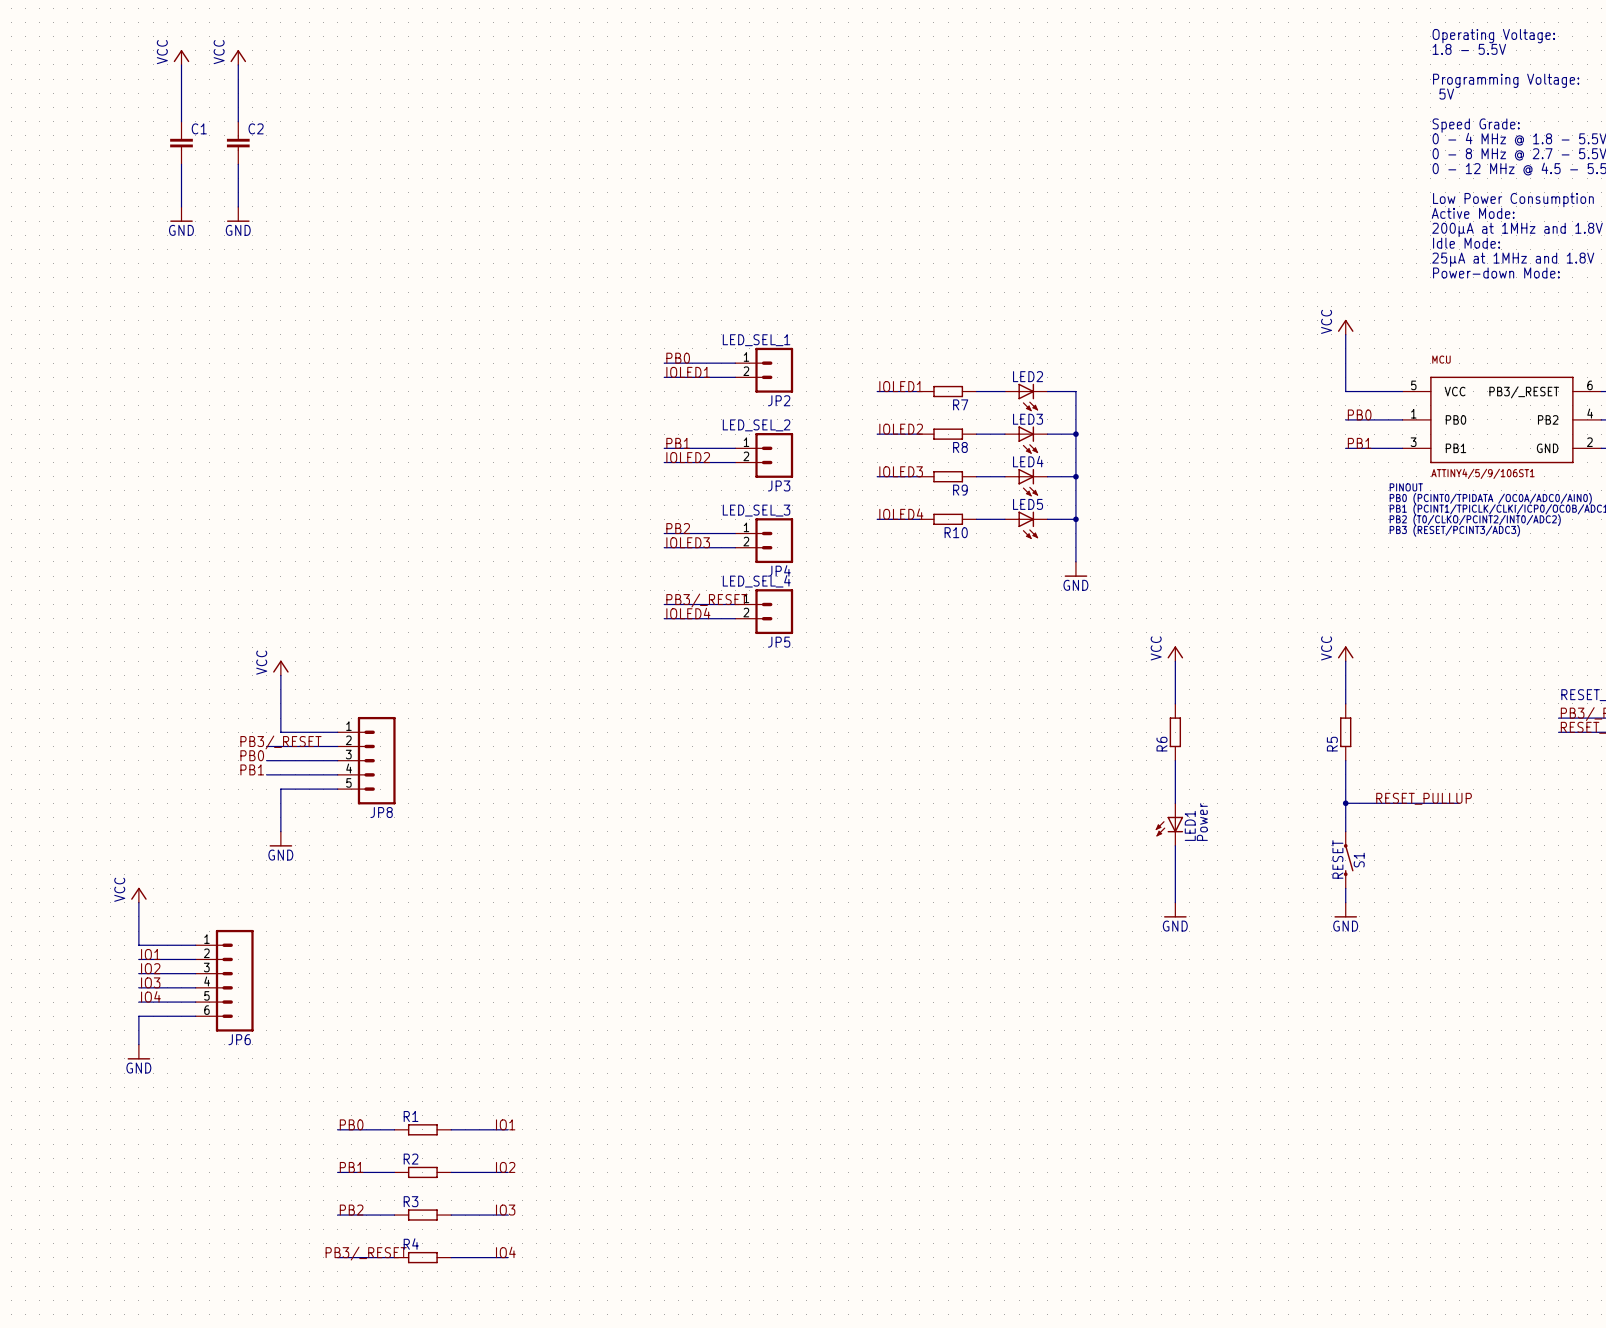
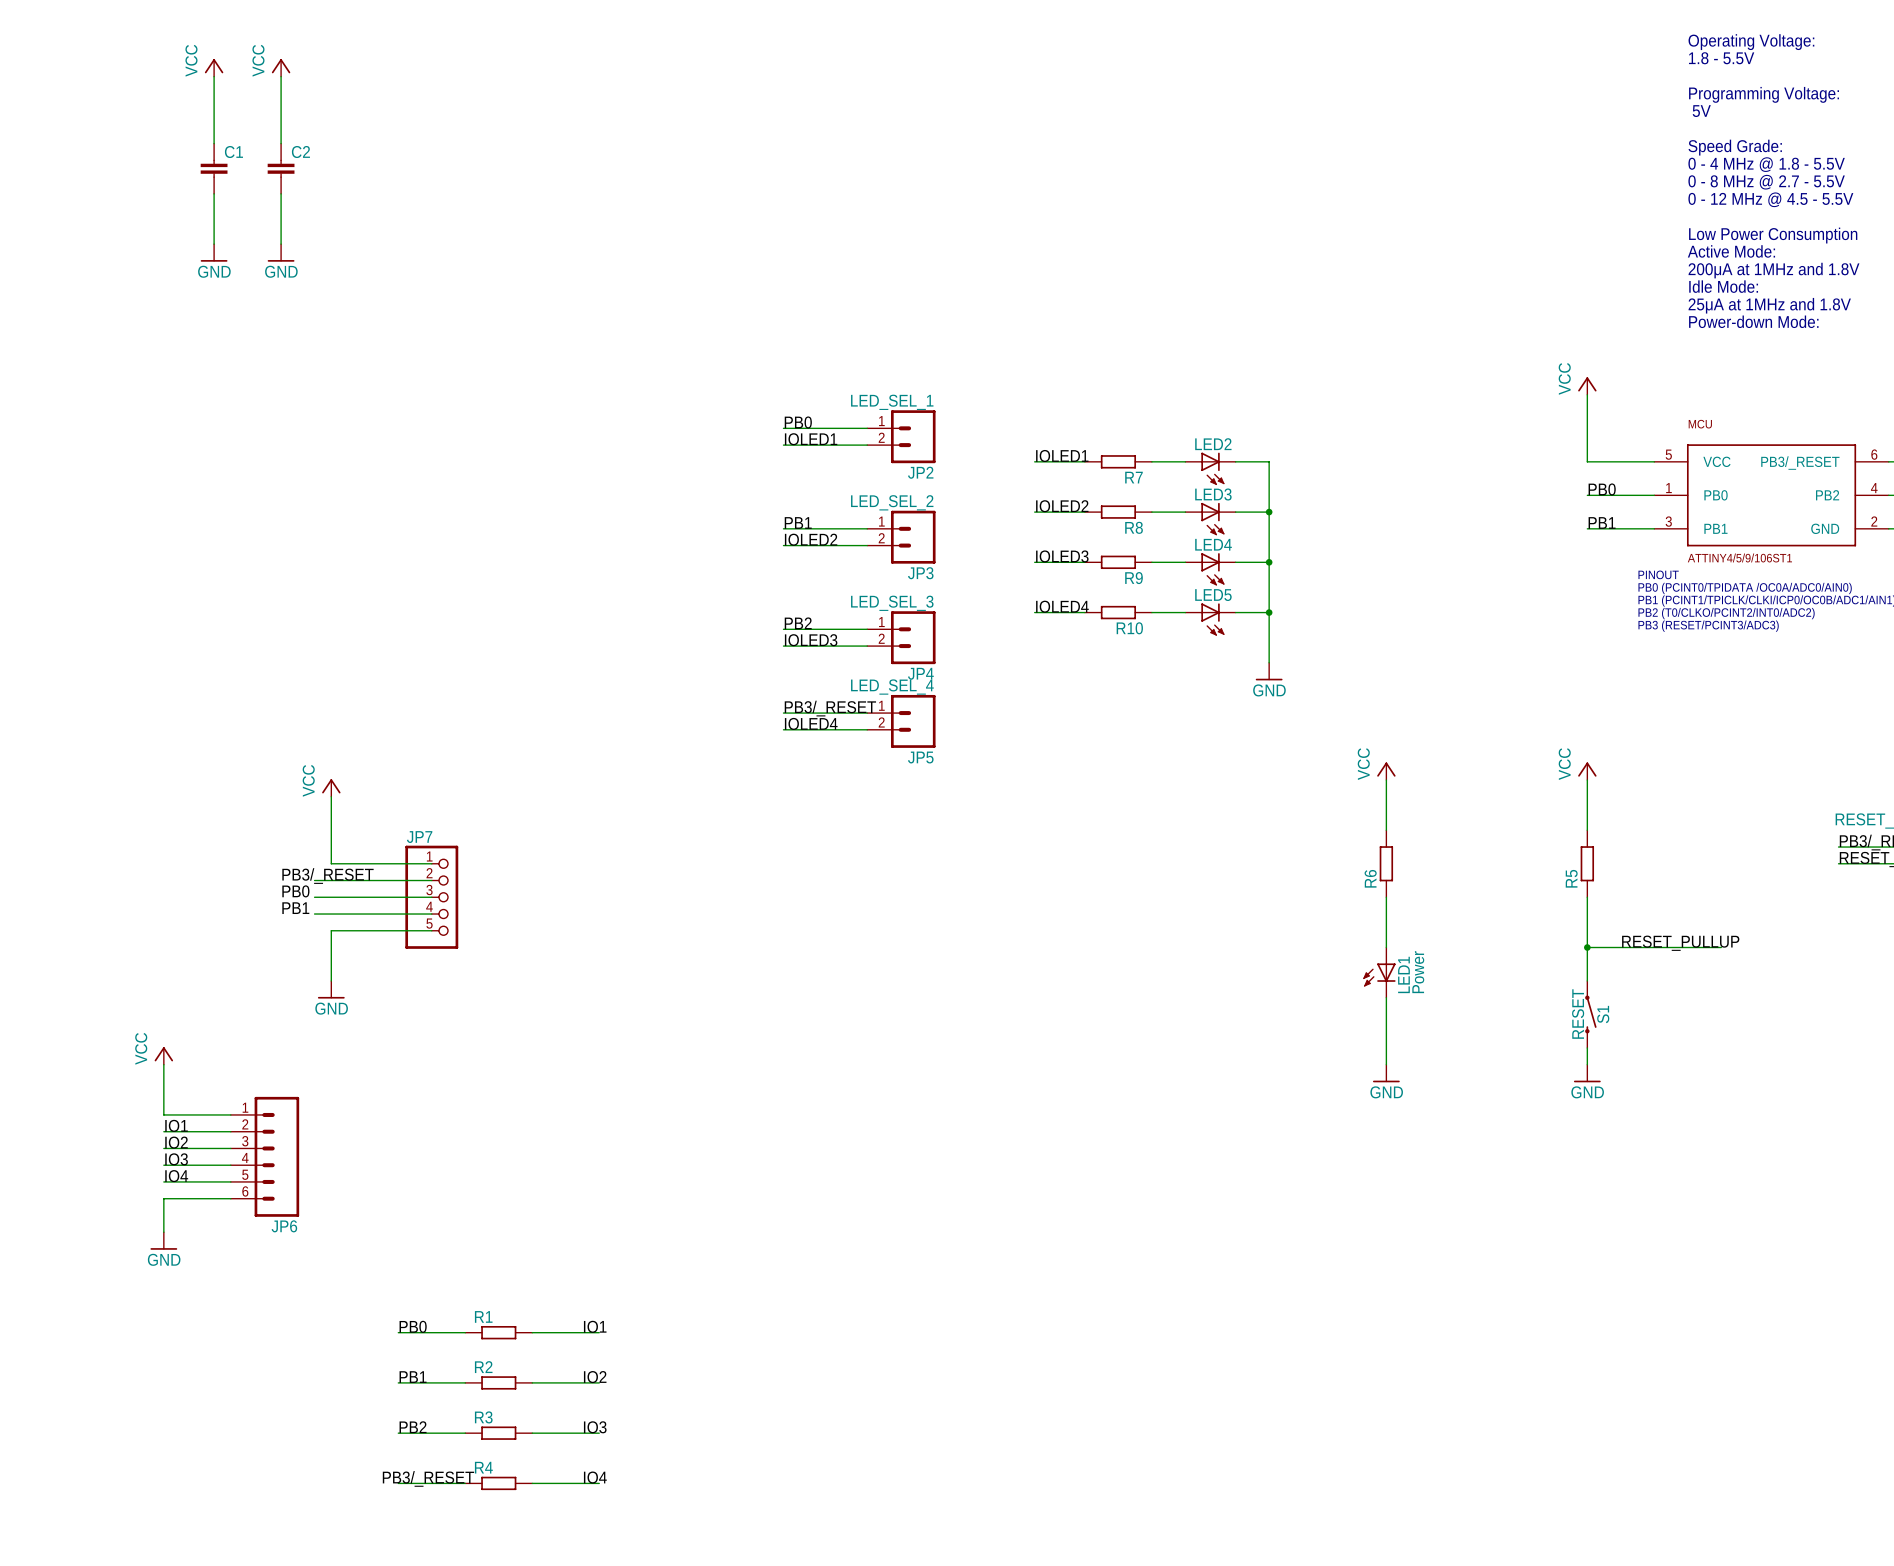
JP8: (366, 760) -> none
JP7: none -> (431, 897)

